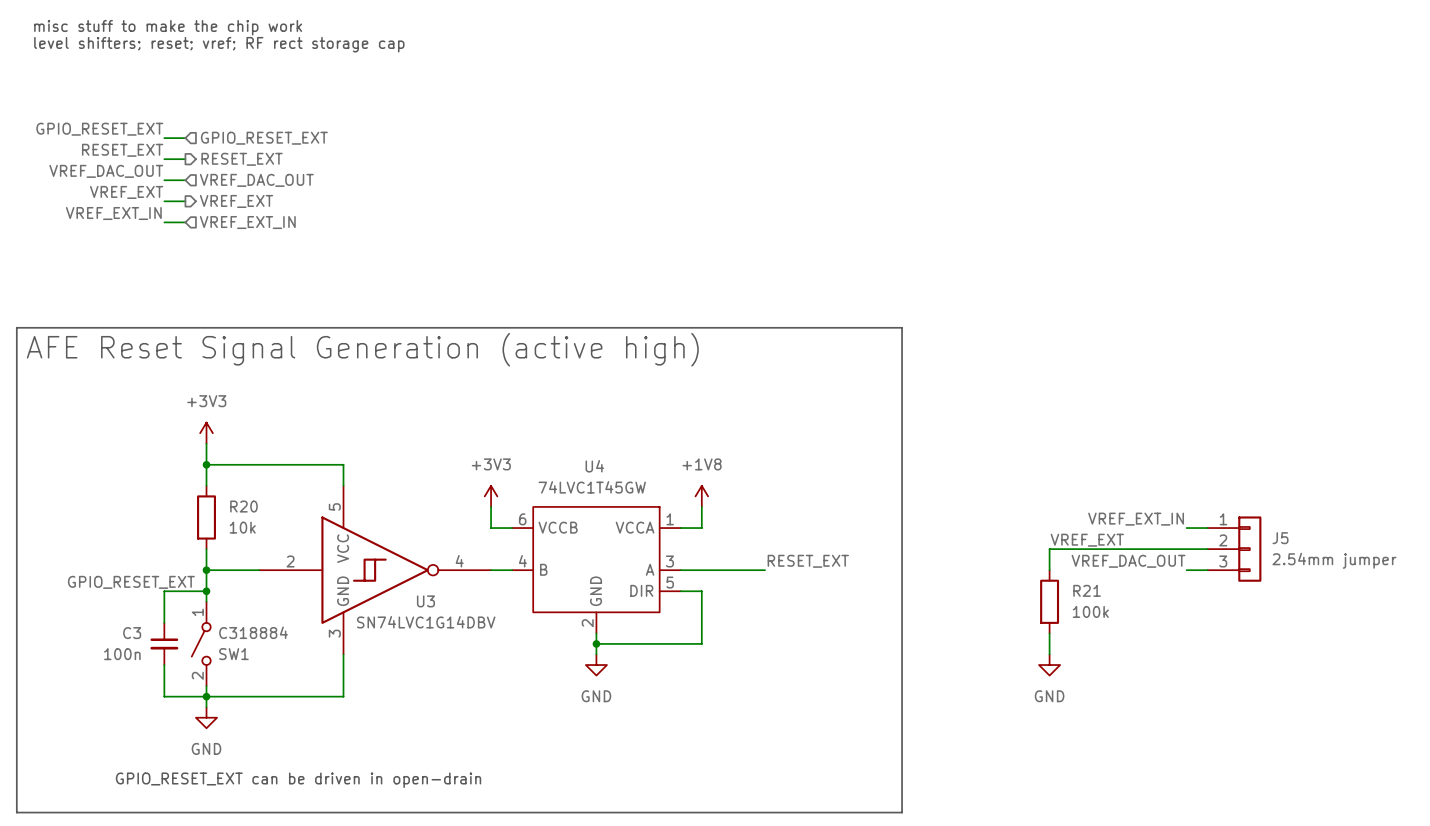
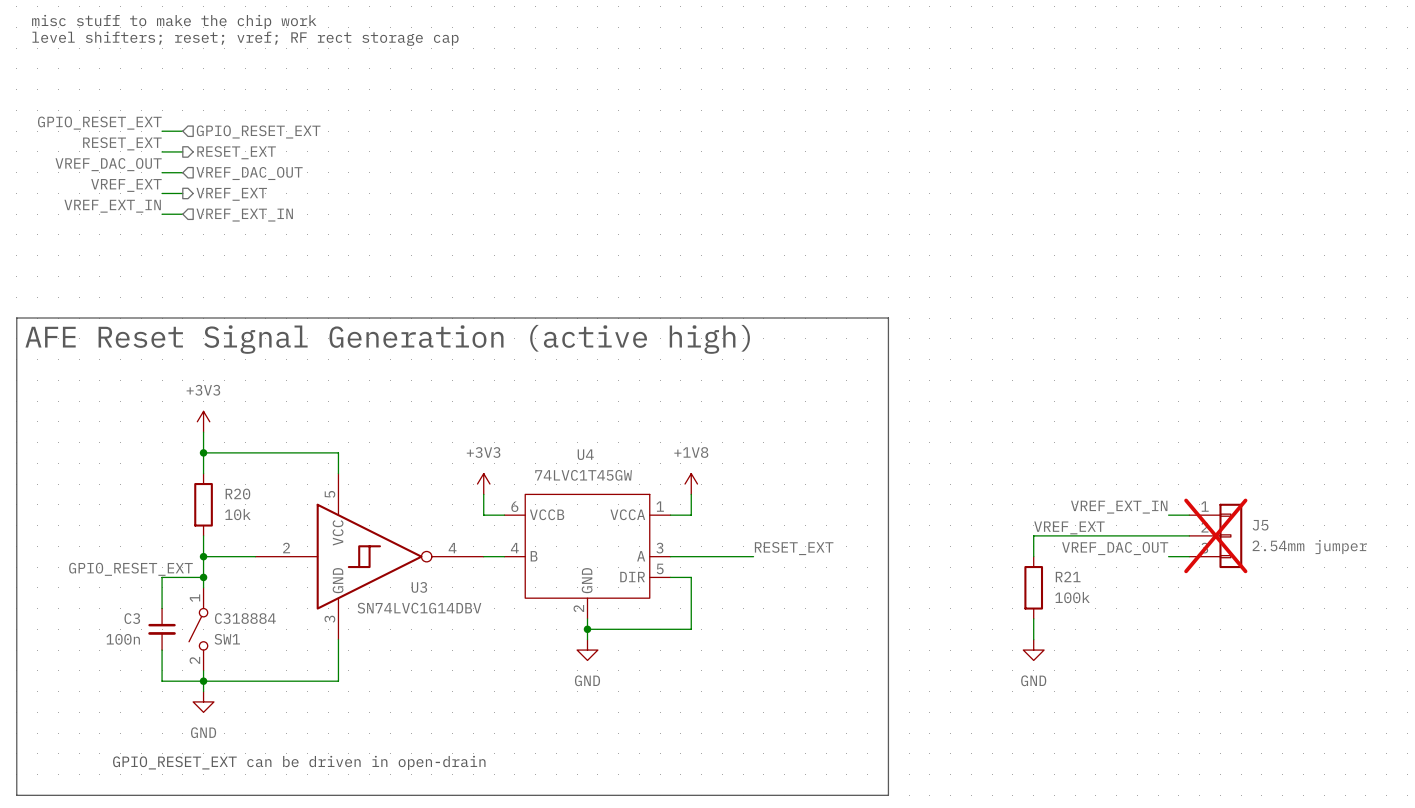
J5 do-not-place cross: none -> (1215, 535)

